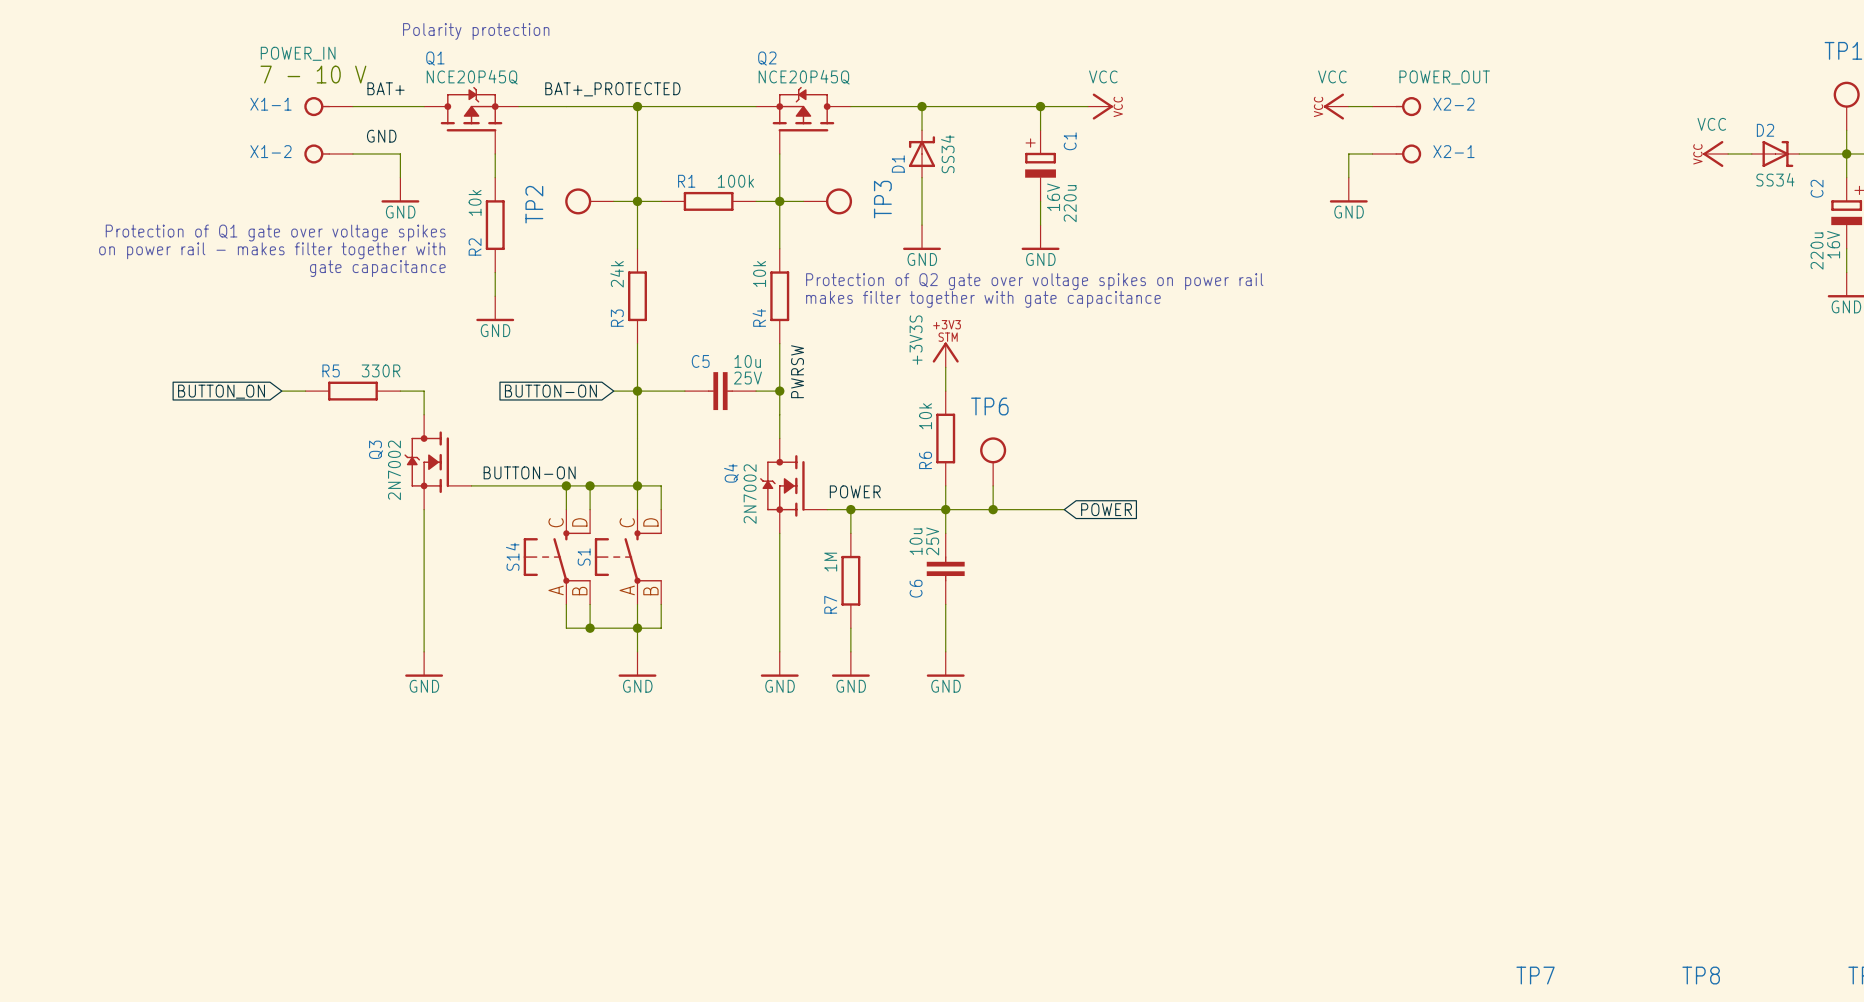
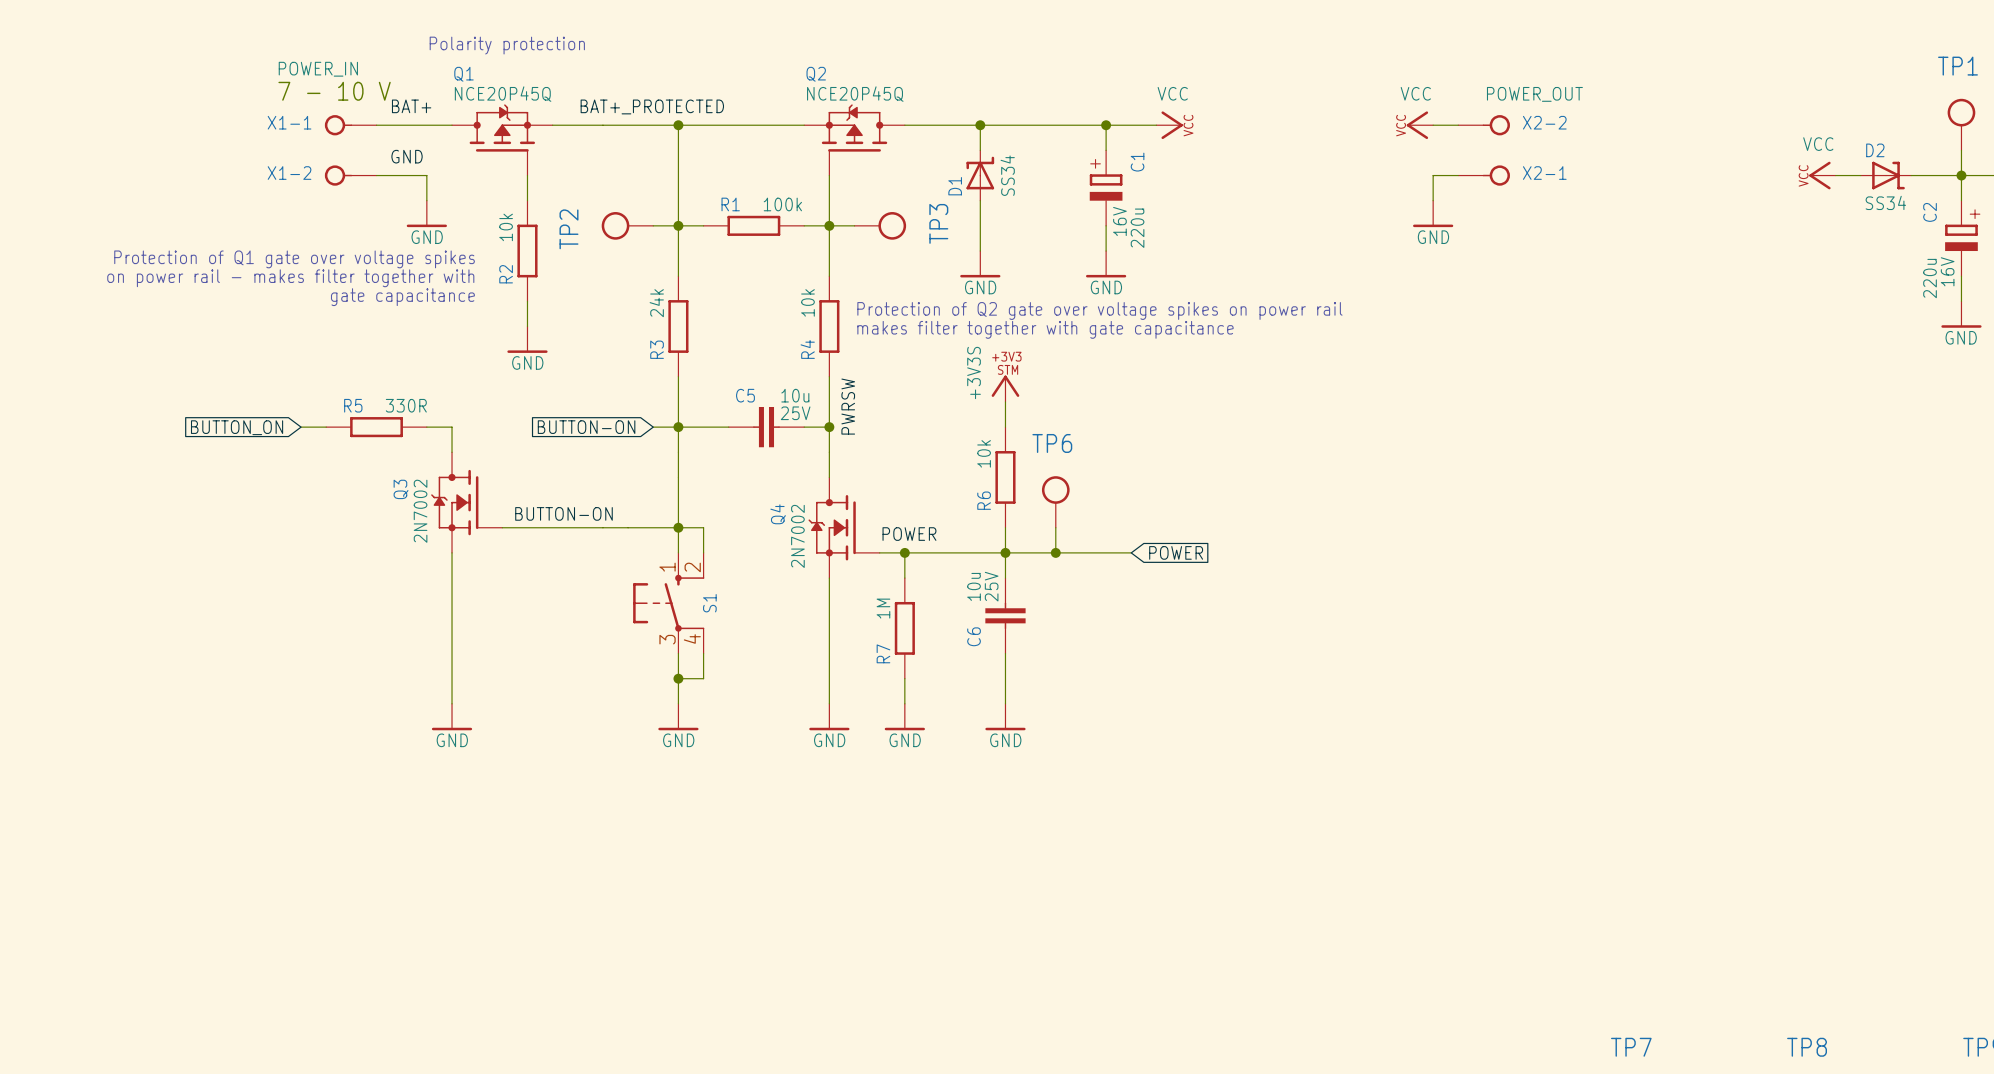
wire: (566, 485) (566, 509) -> none
junction: (566, 485) -> none
wire: (590, 485) (590, 509) -> none
junction: (590, 485) -> none
S1 pin number: C (627, 522) -> 1 (667, 567)
S1 pin number: D (650, 522) -> 2 (692, 567)
S14: (557, 557) -> none
S1 name position: S1 (584, 557) -> S1 (709, 603)
S1 pin number: A (627, 590) -> 3 (667, 639)
S1 pin number: B (650, 591) -> 4 (692, 638)
wire: (566, 604) (566, 628) (637, 628) -> none
wire: (590, 604) (590, 628) -> none
junction: (590, 628) -> none

